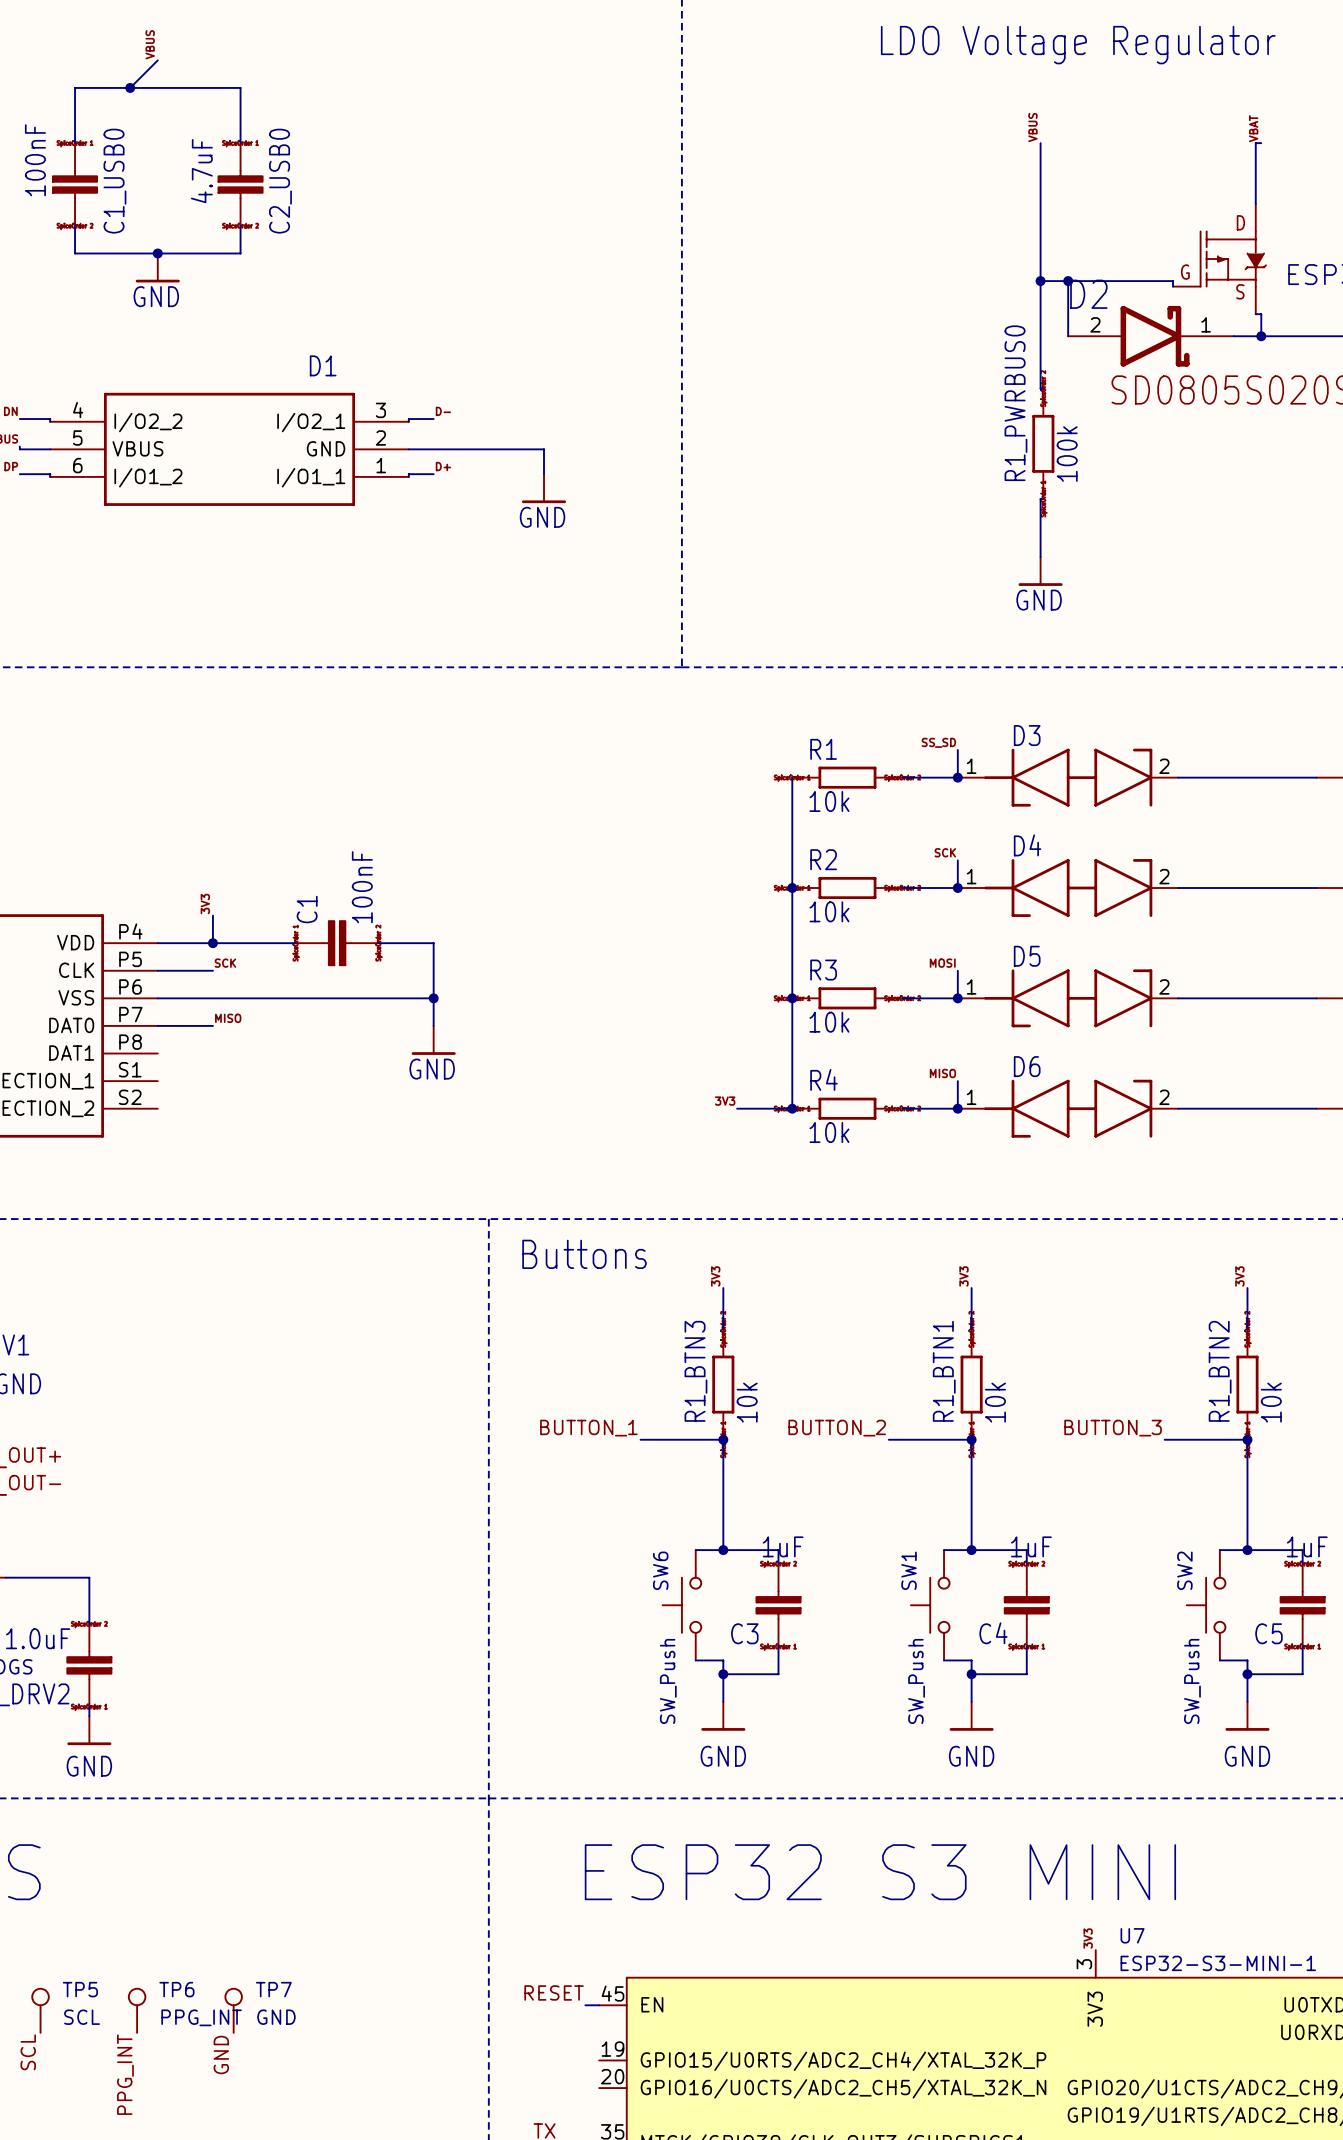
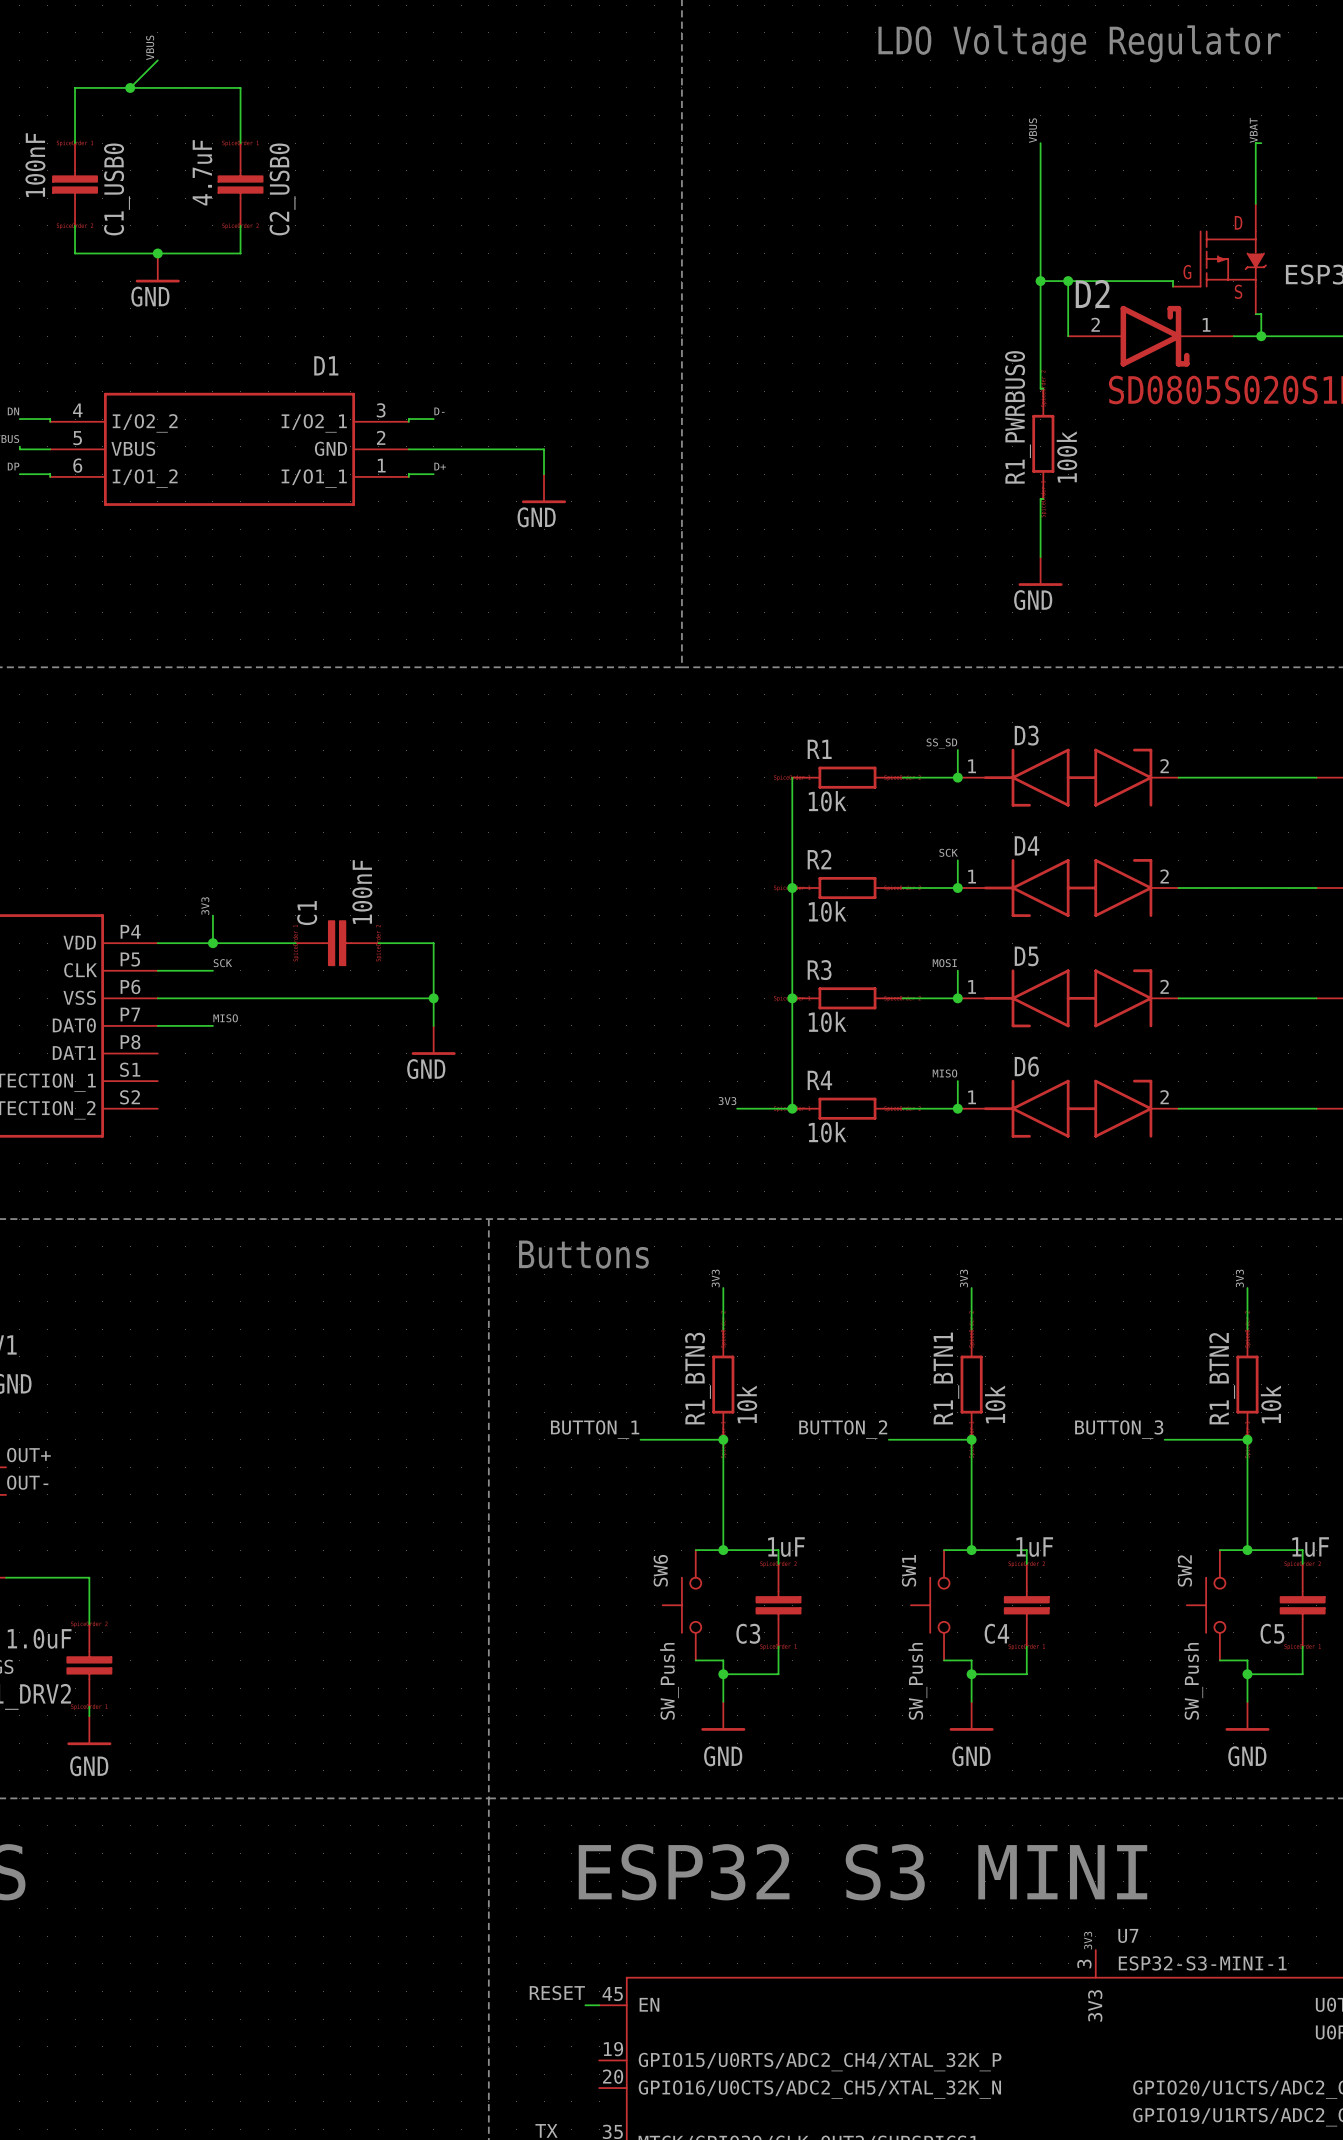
TP5: SCL (40, 2010) -> none
TP6: PPG_INT (137, 2010) -> none
TP7: GND (233, 2010) -> none
label: SCL (28, 2052) -> none
label: GND (221, 2054) -> none
label: PPG_INT (125, 2074) -> none

